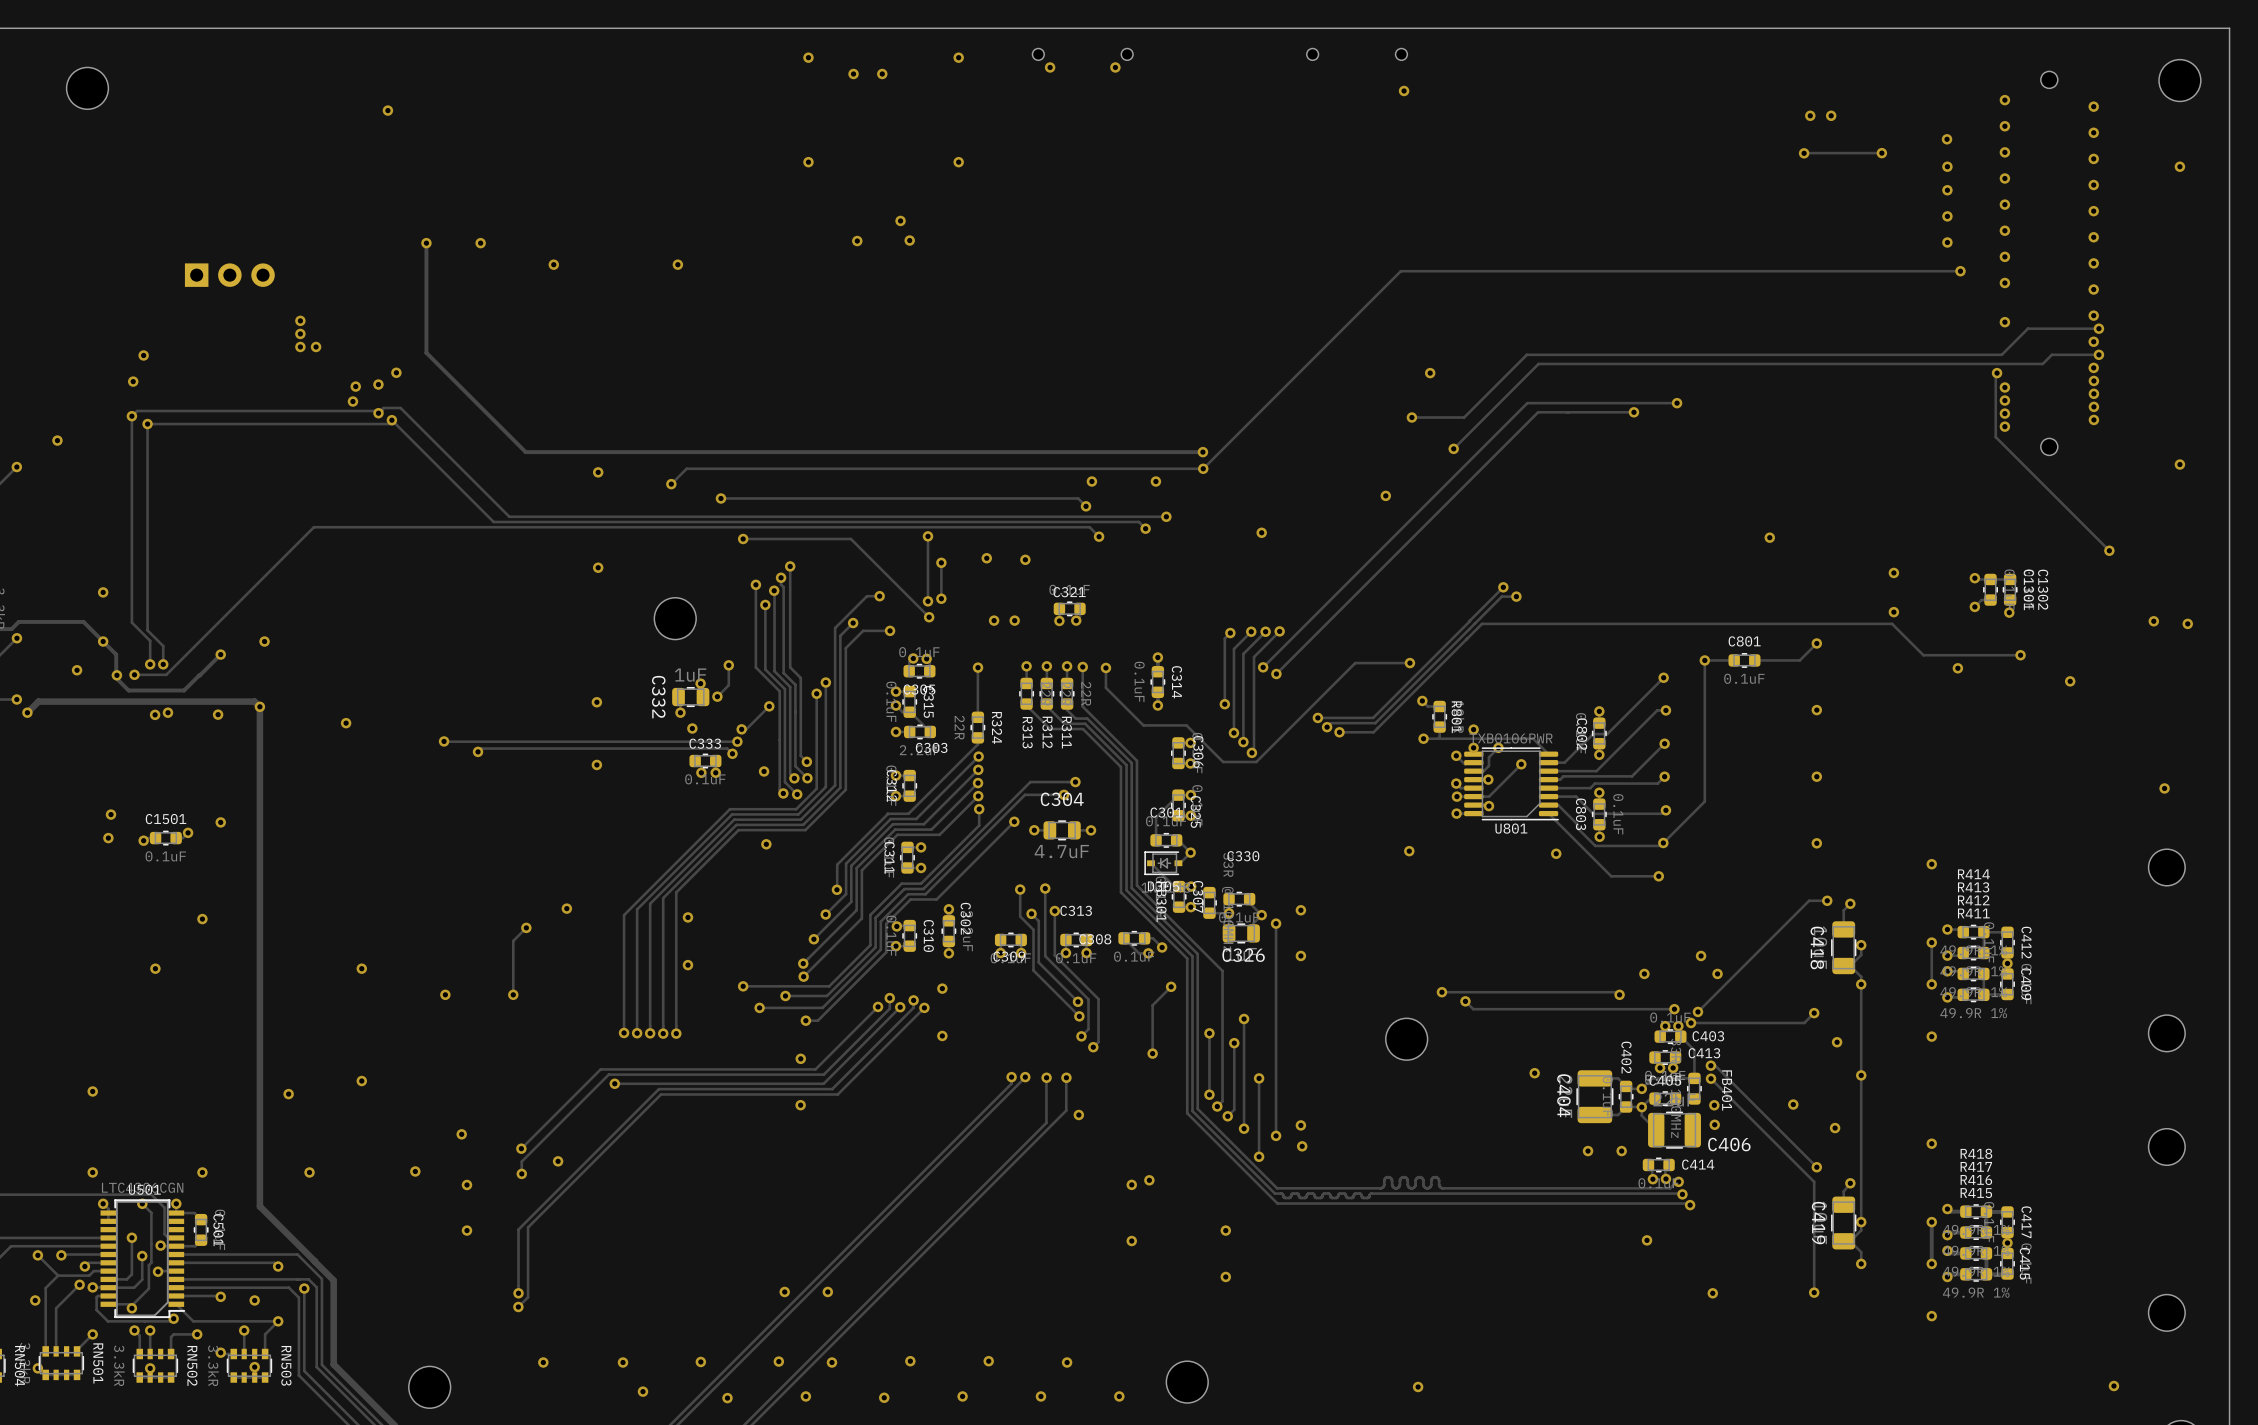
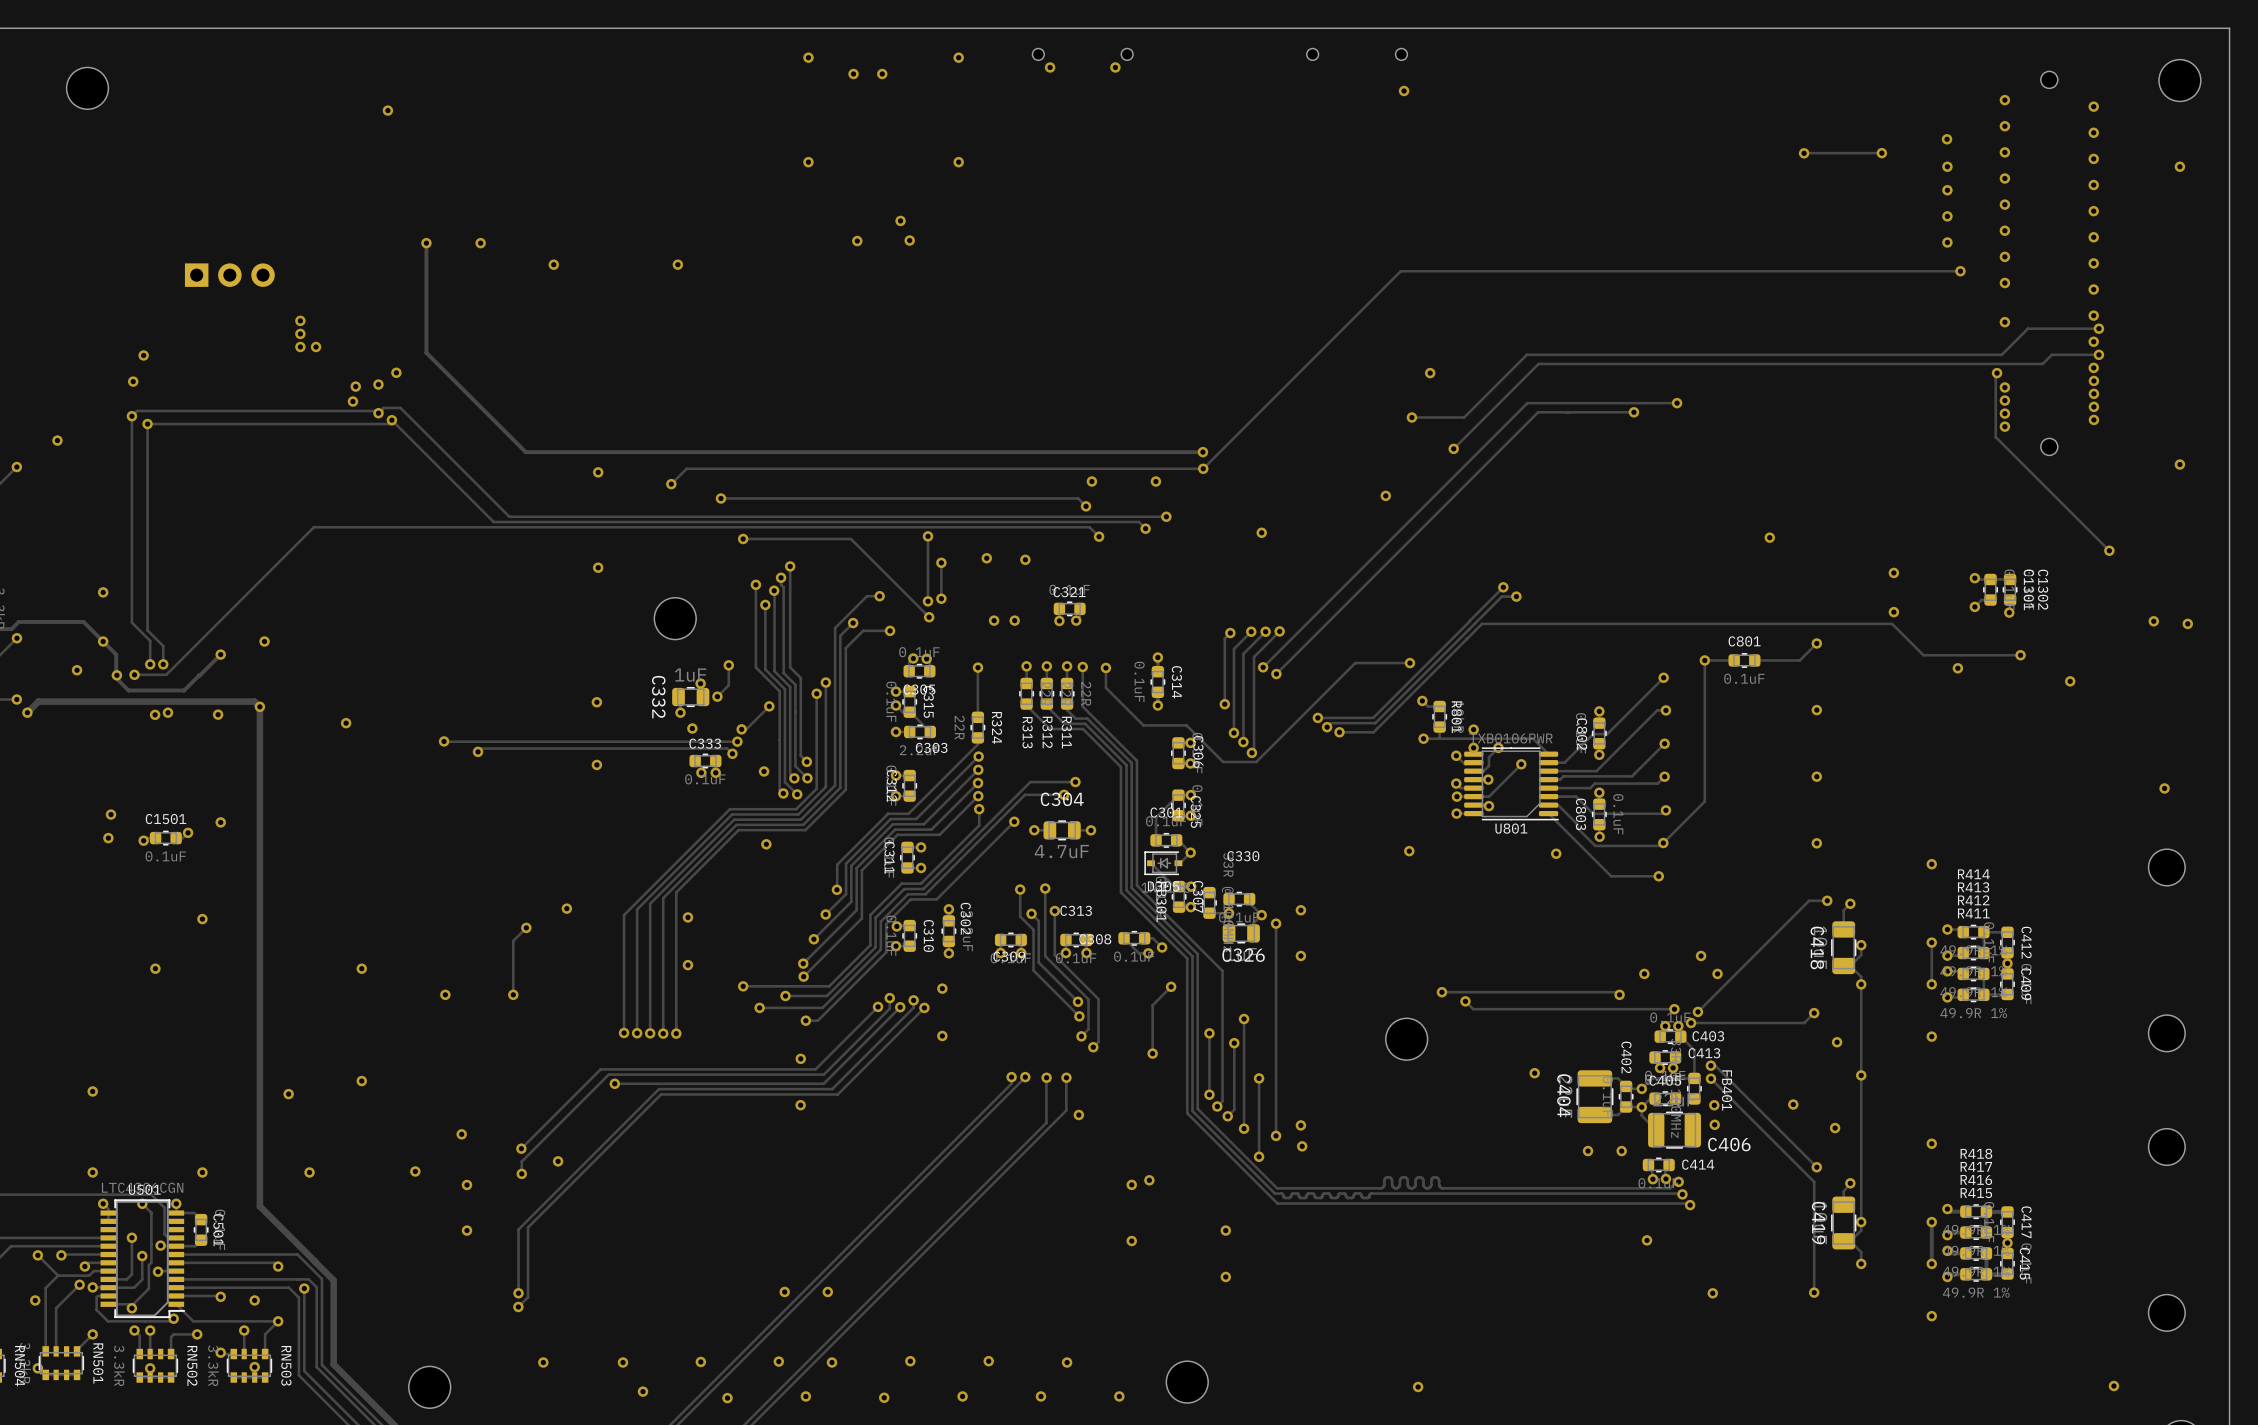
via: (1810, 115) -> none
via: (1831, 115) -> none

